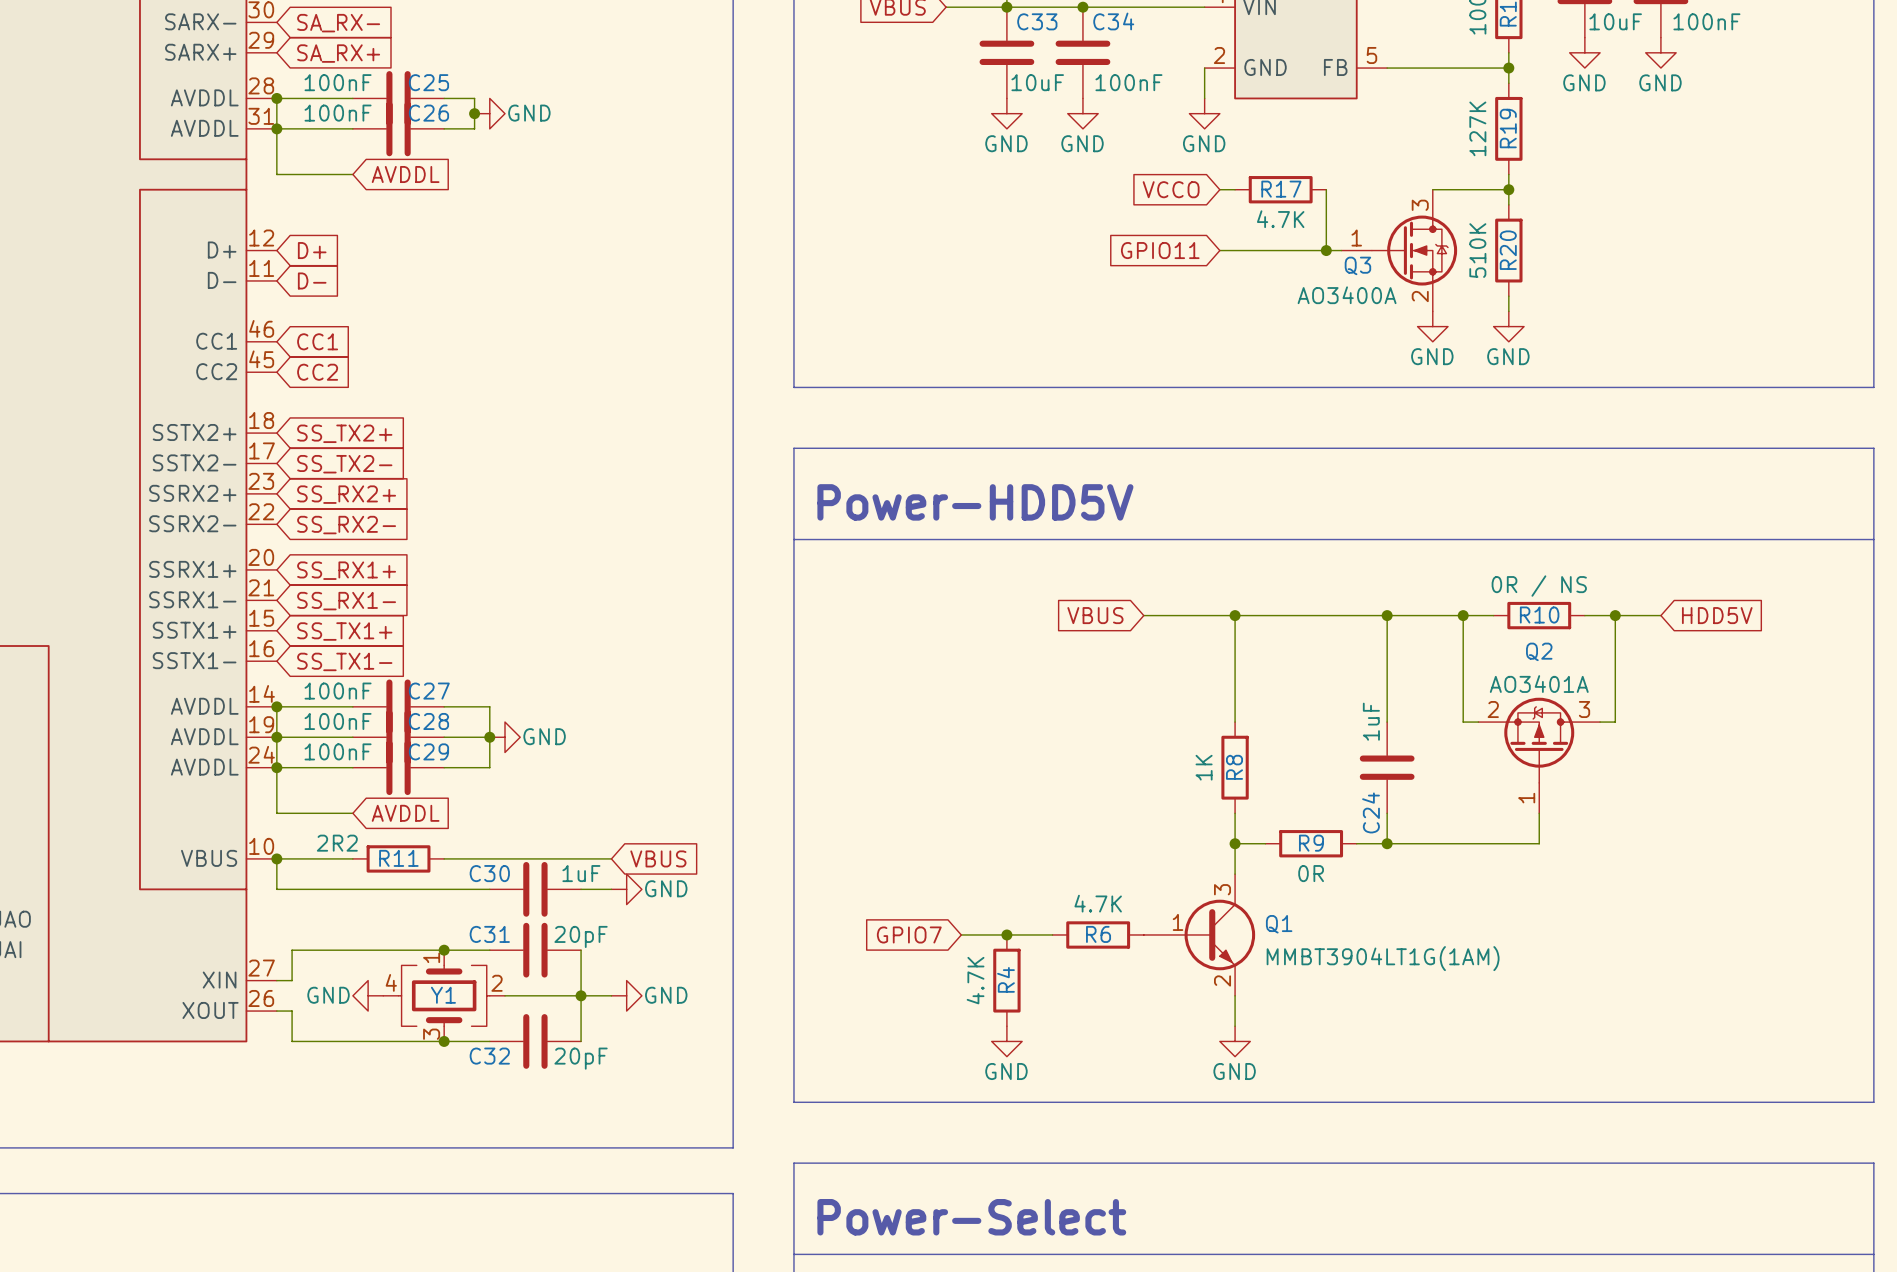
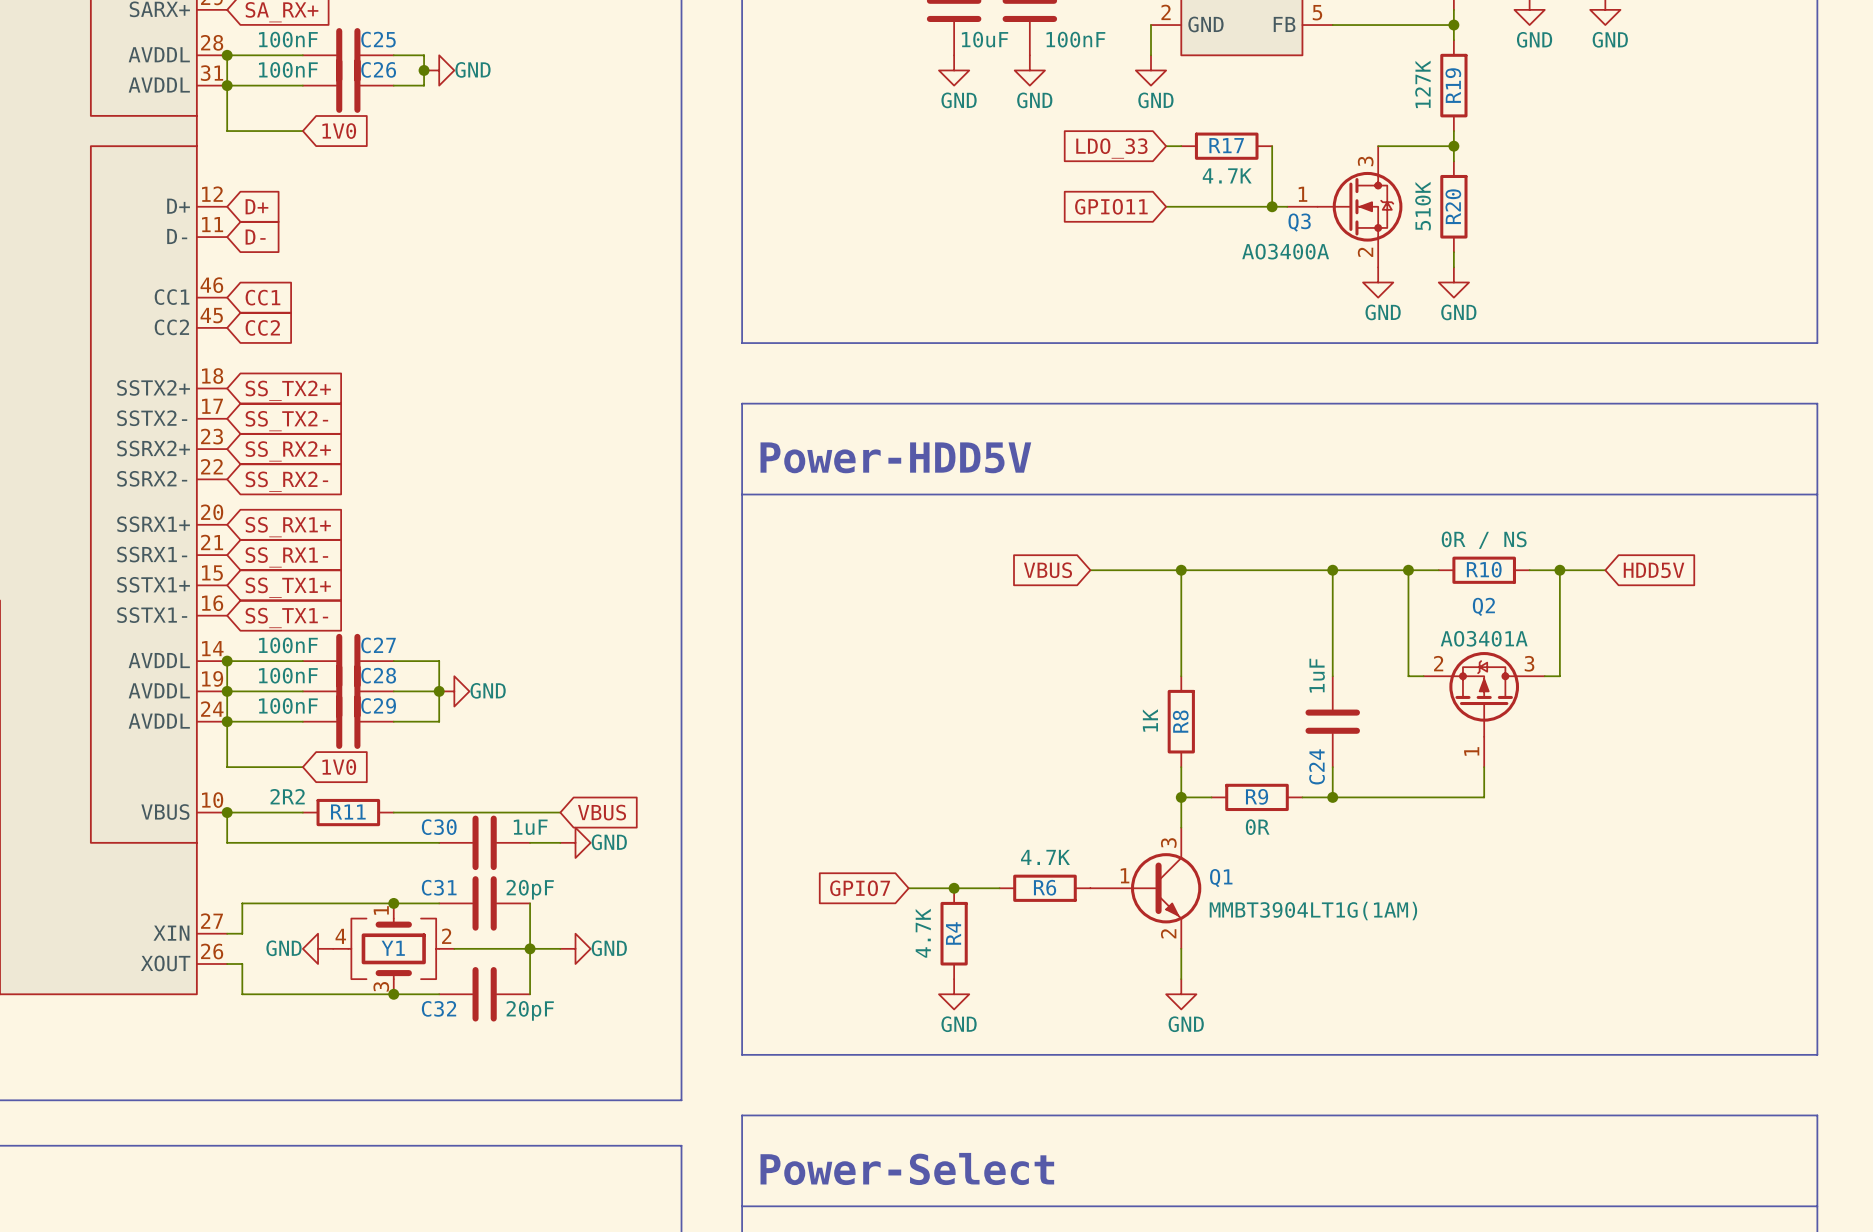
global label: AVDDL (405, 174) -> 1V0 (339, 131)
global label: VCCO (1171, 189) -> LDO_33 (1111, 148)
global label: AVDDL (405, 813) -> 1V0 (339, 767)

